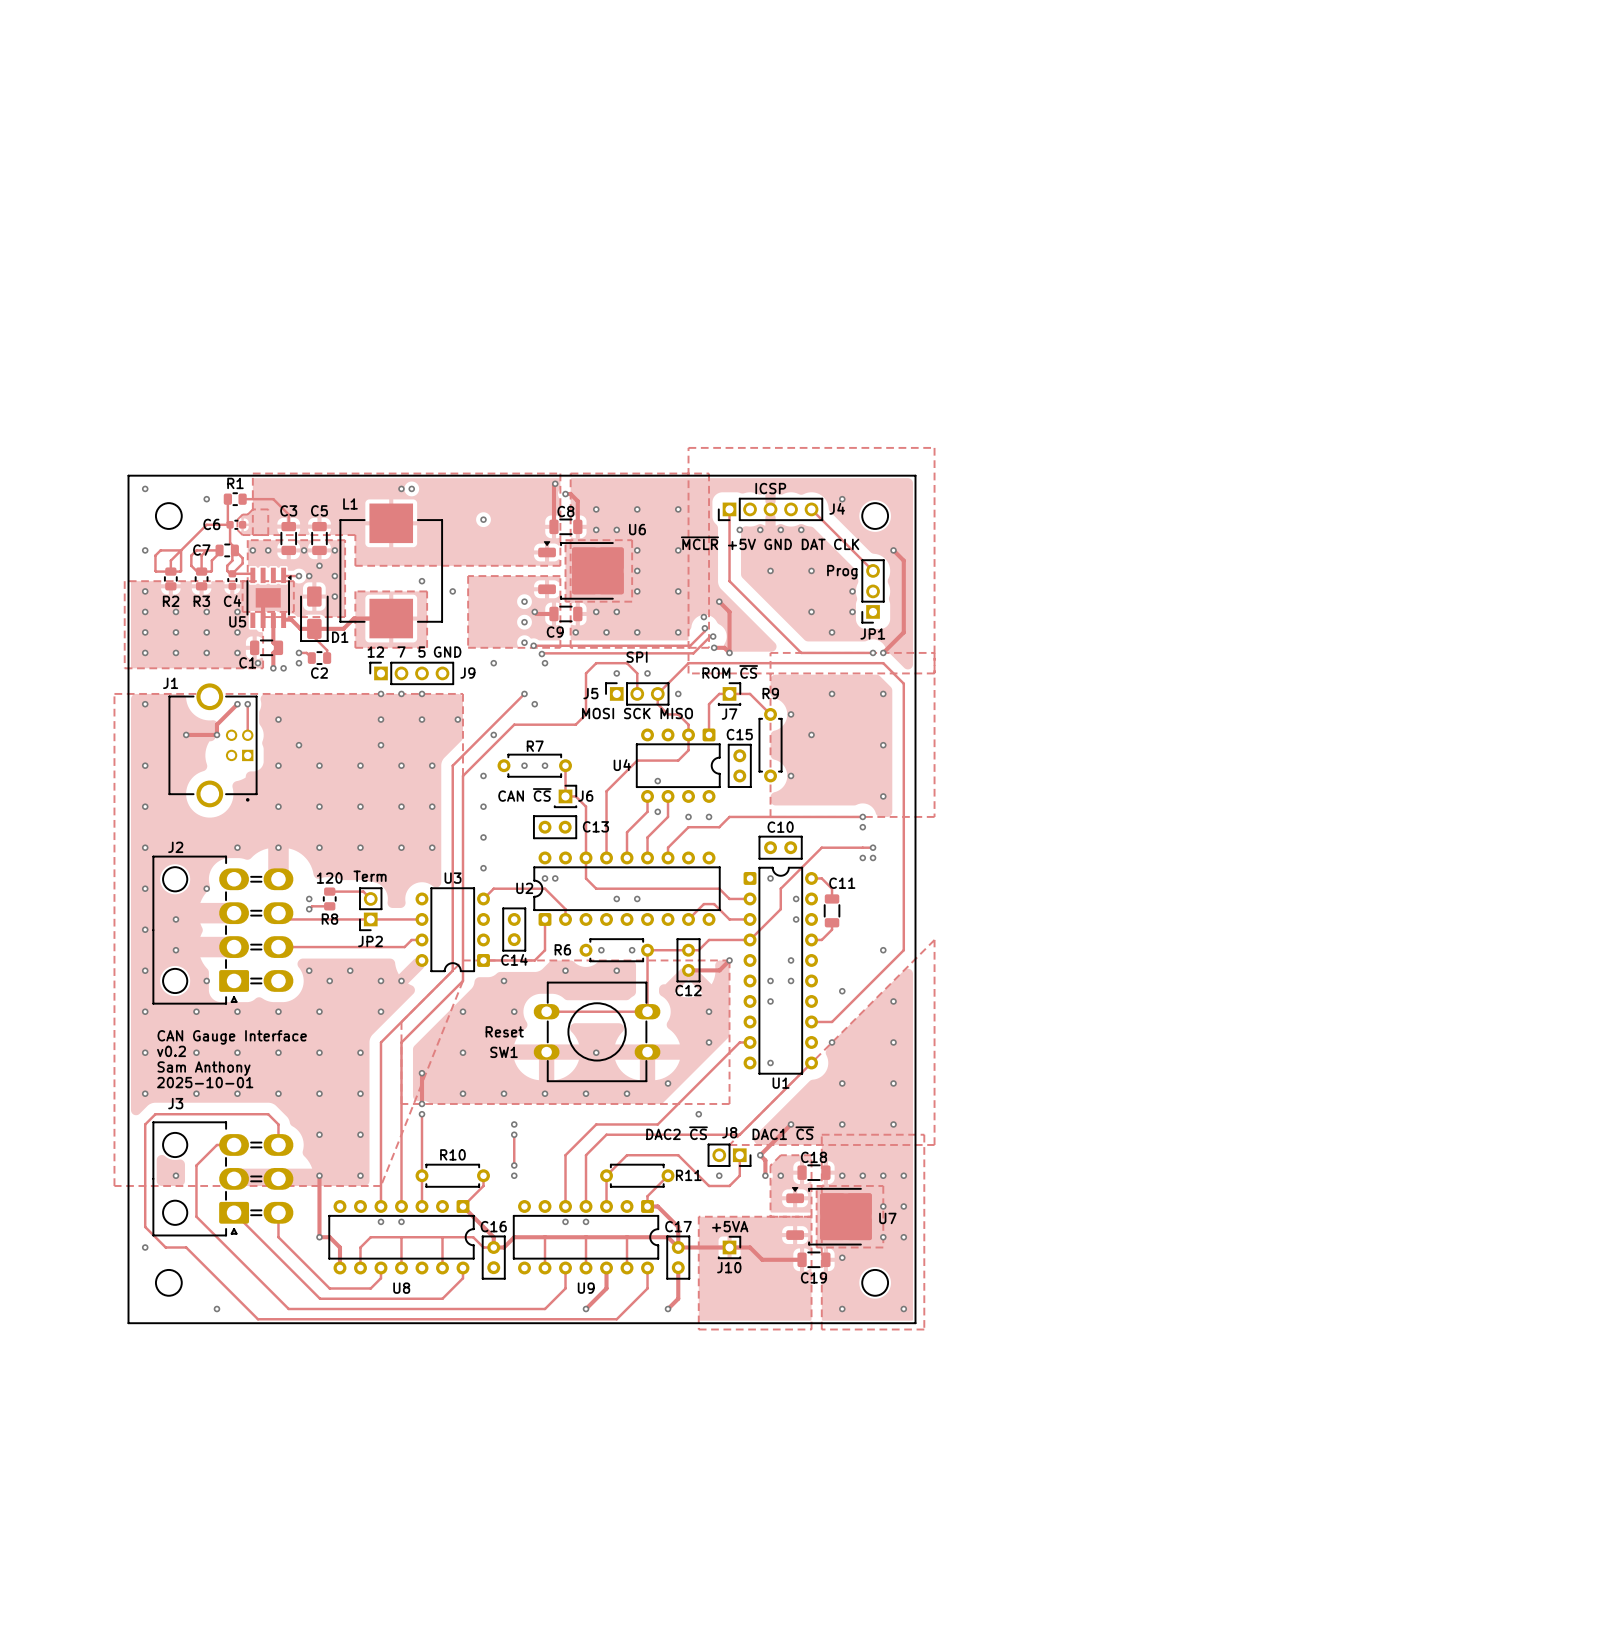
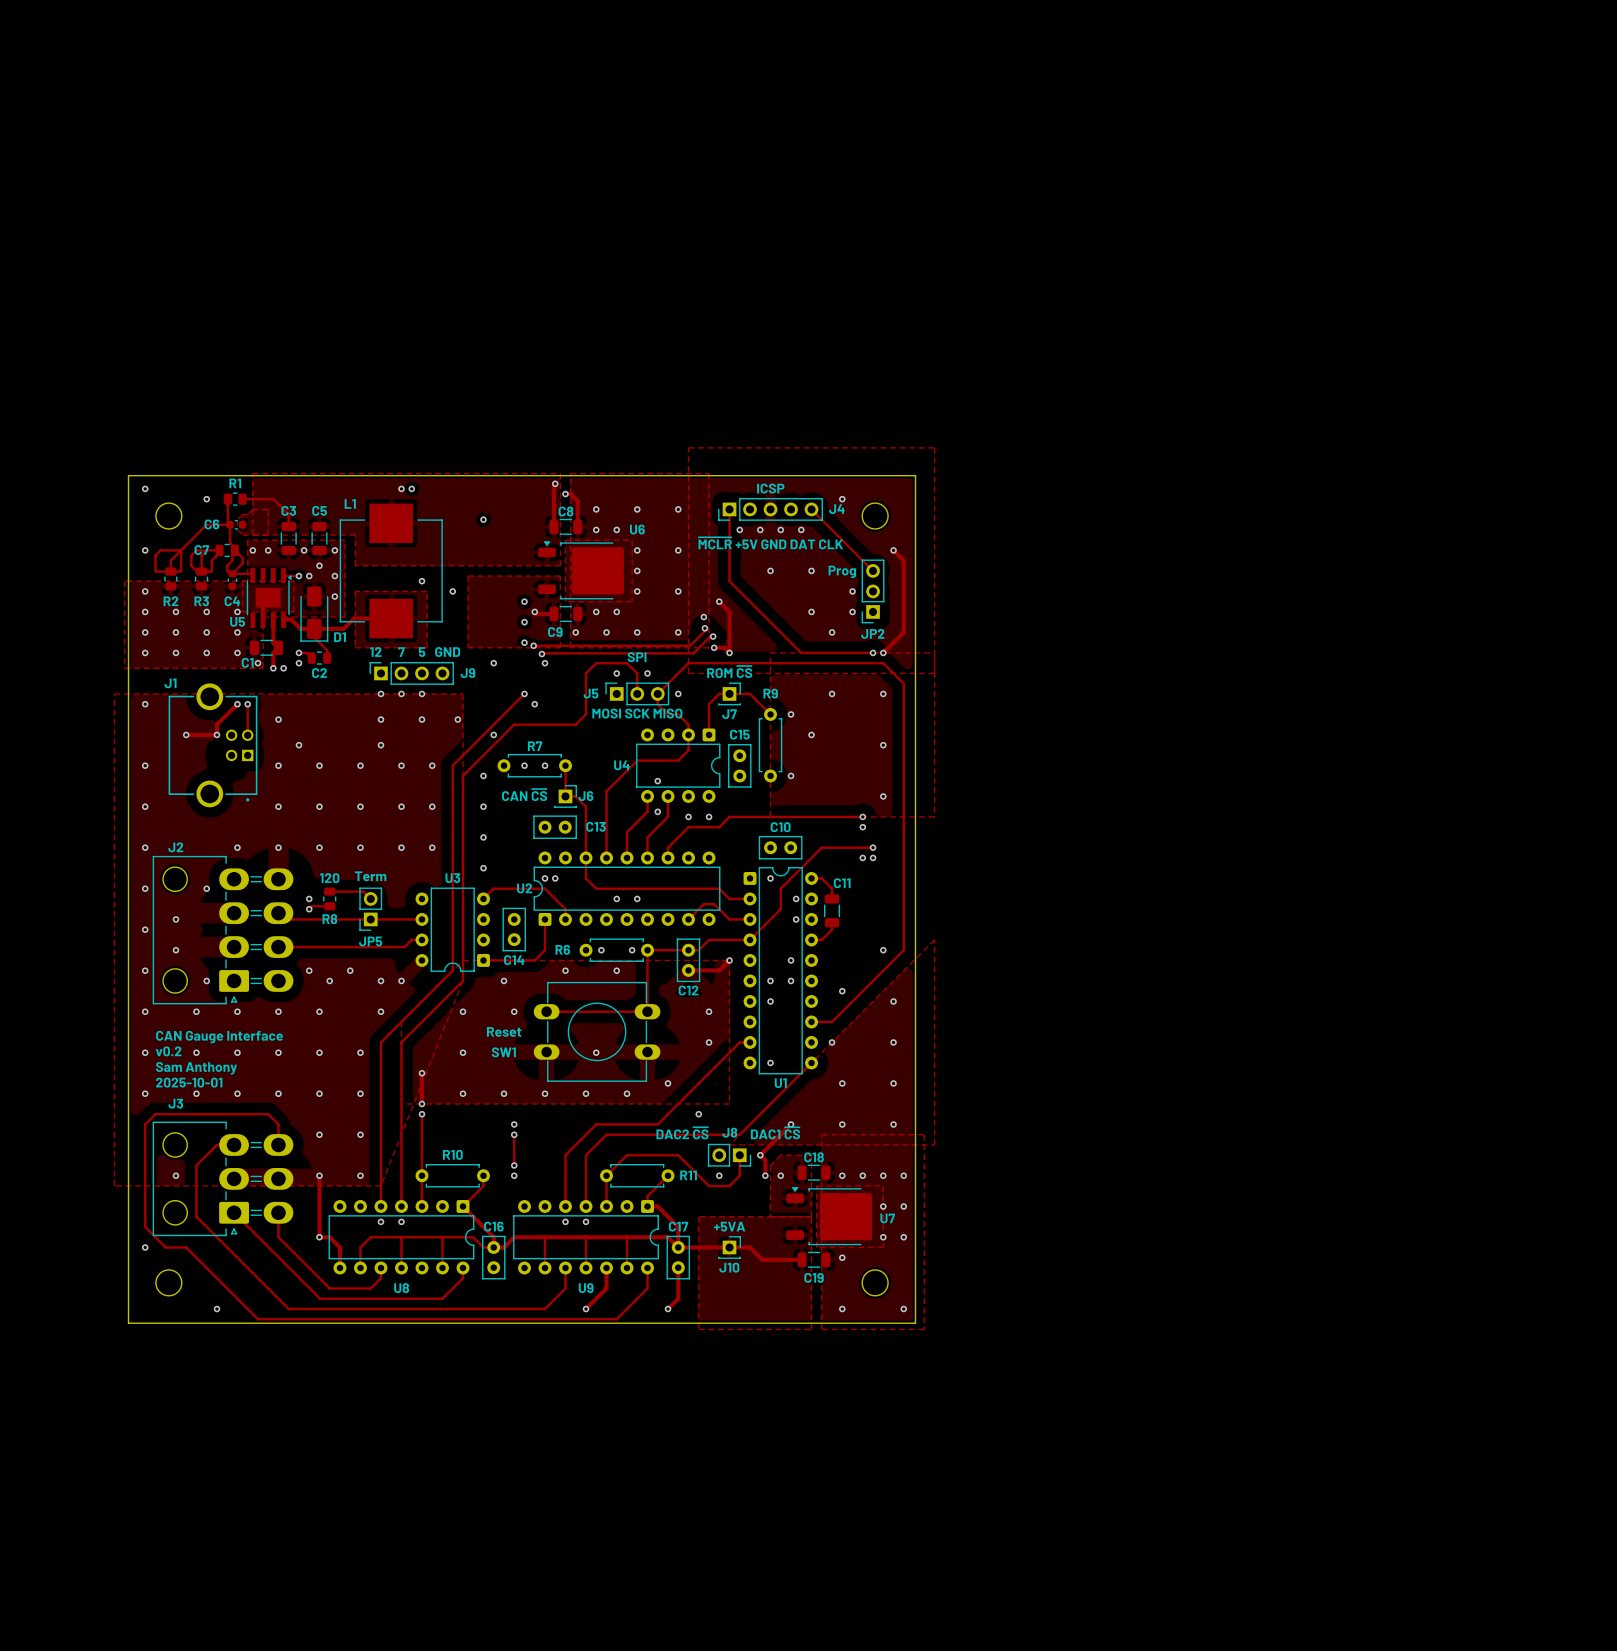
JP1 name: JP1 (872, 633) -> JP2 (872, 633)
JP2 name: JP2 (370, 941) -> JP5 (370, 941)

